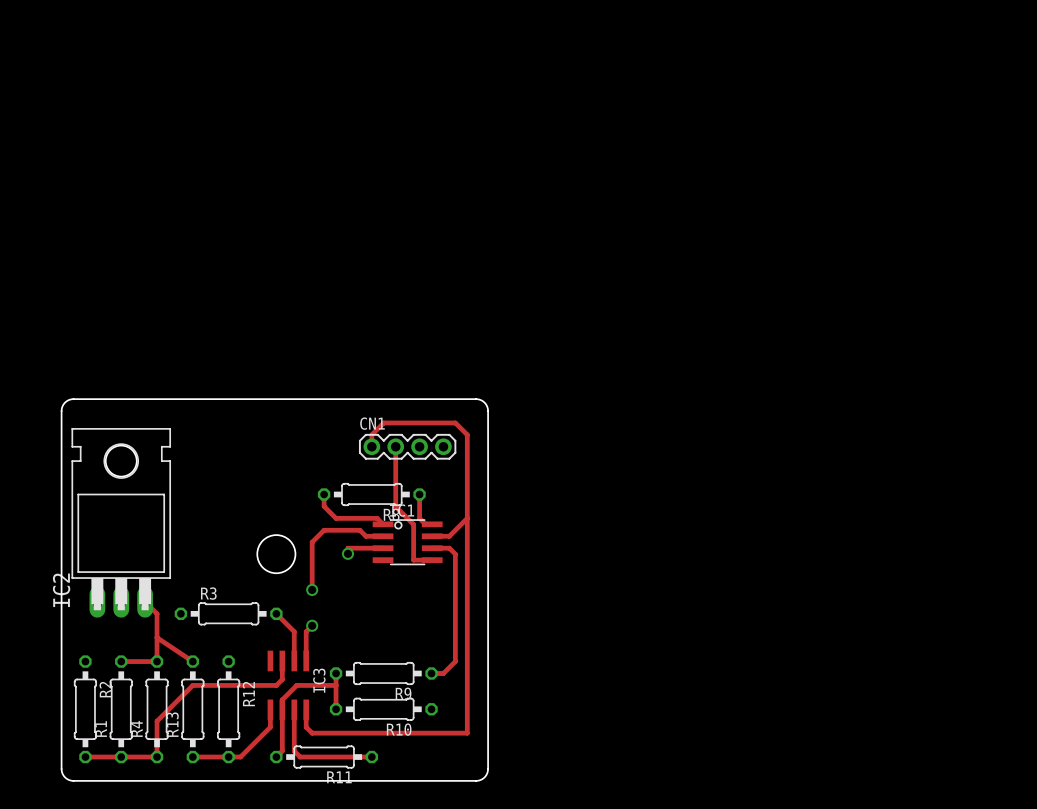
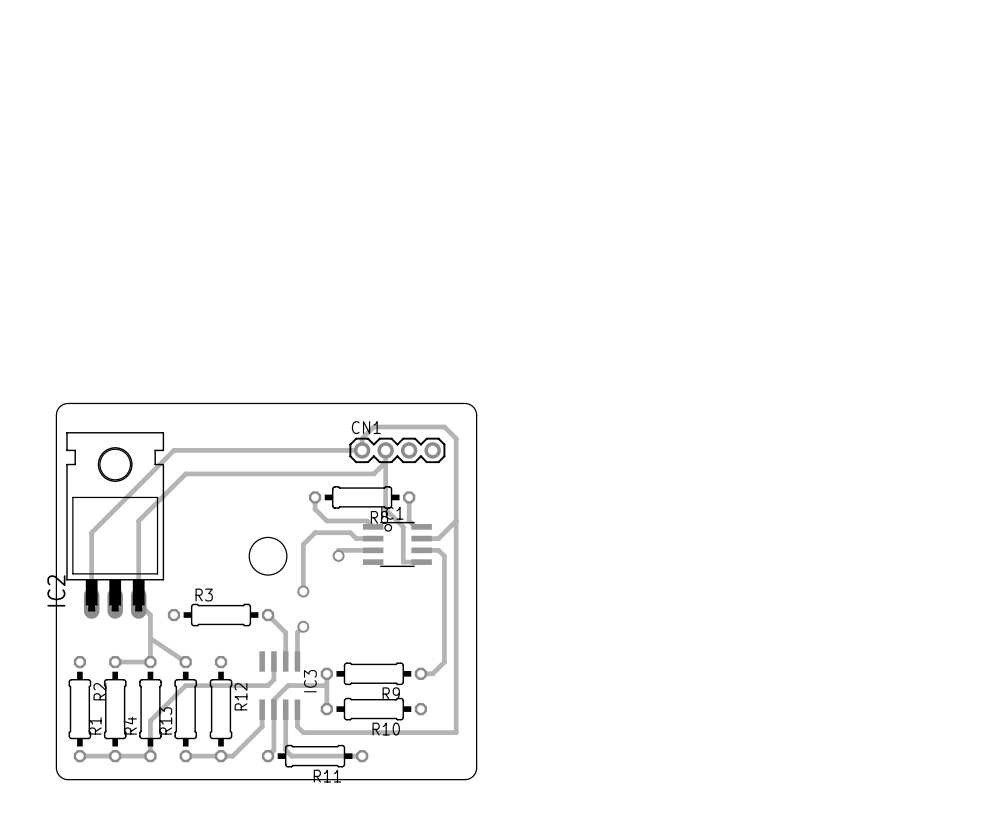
track: none -> (362, 450) (173, 450) (91, 532) (91, 603)
track: none -> (385, 462) (373, 473) (185, 473) (138, 520) (138, 603)

